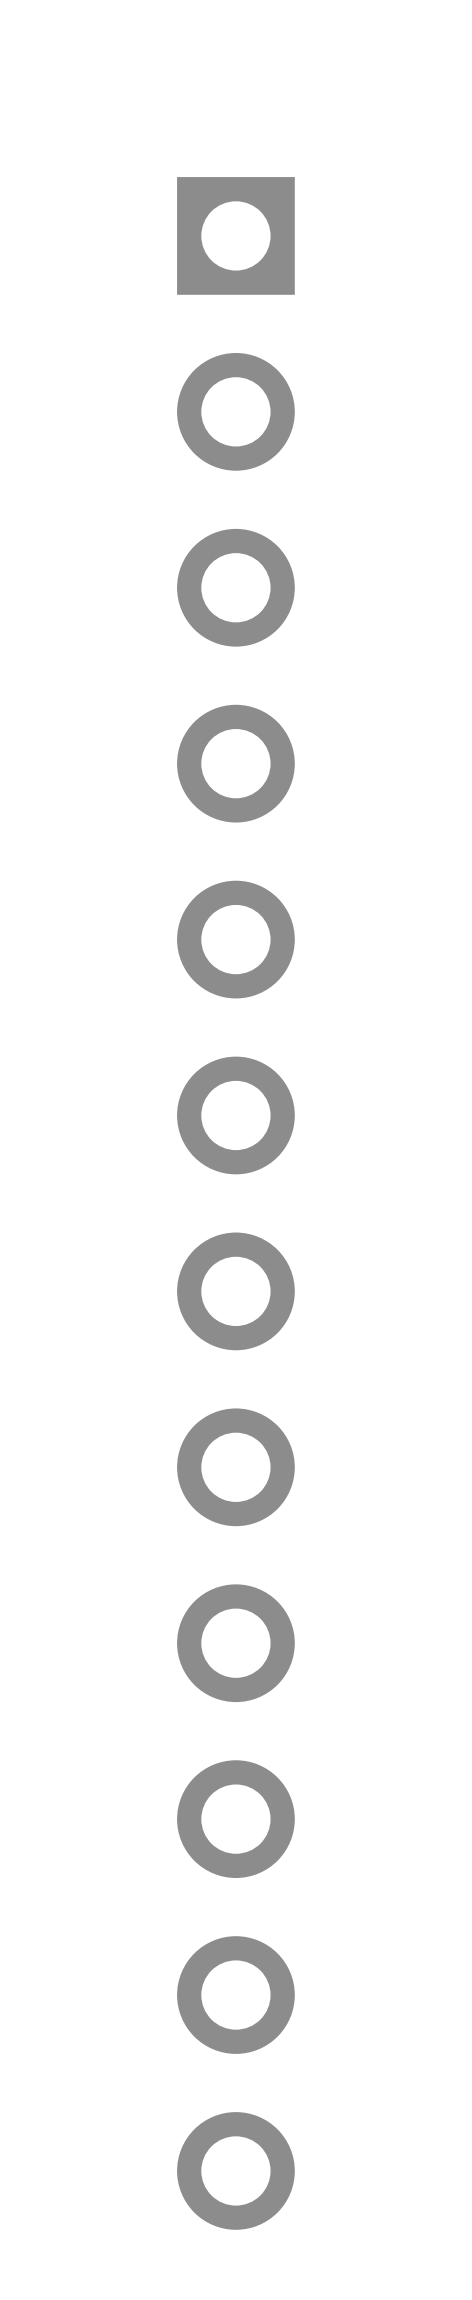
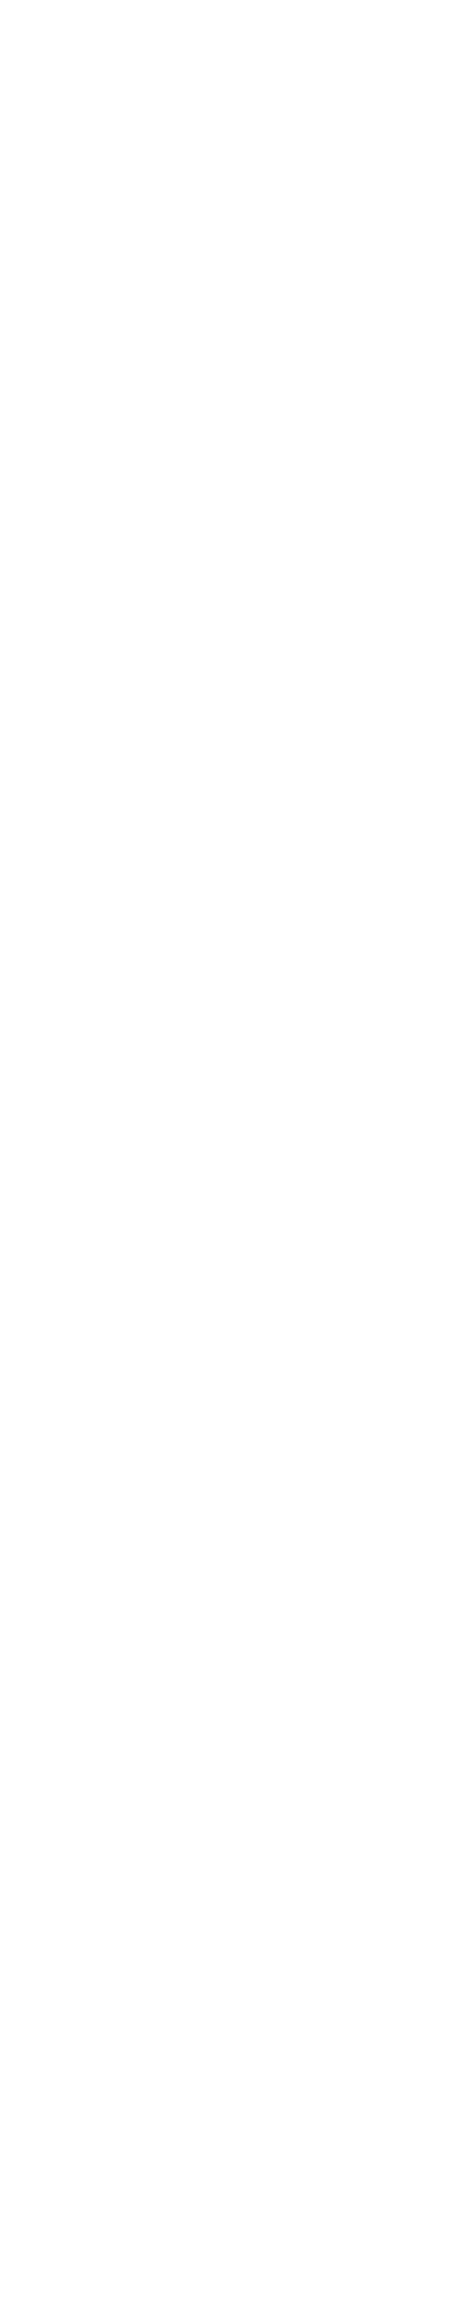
part: (235, 1203) -> none

